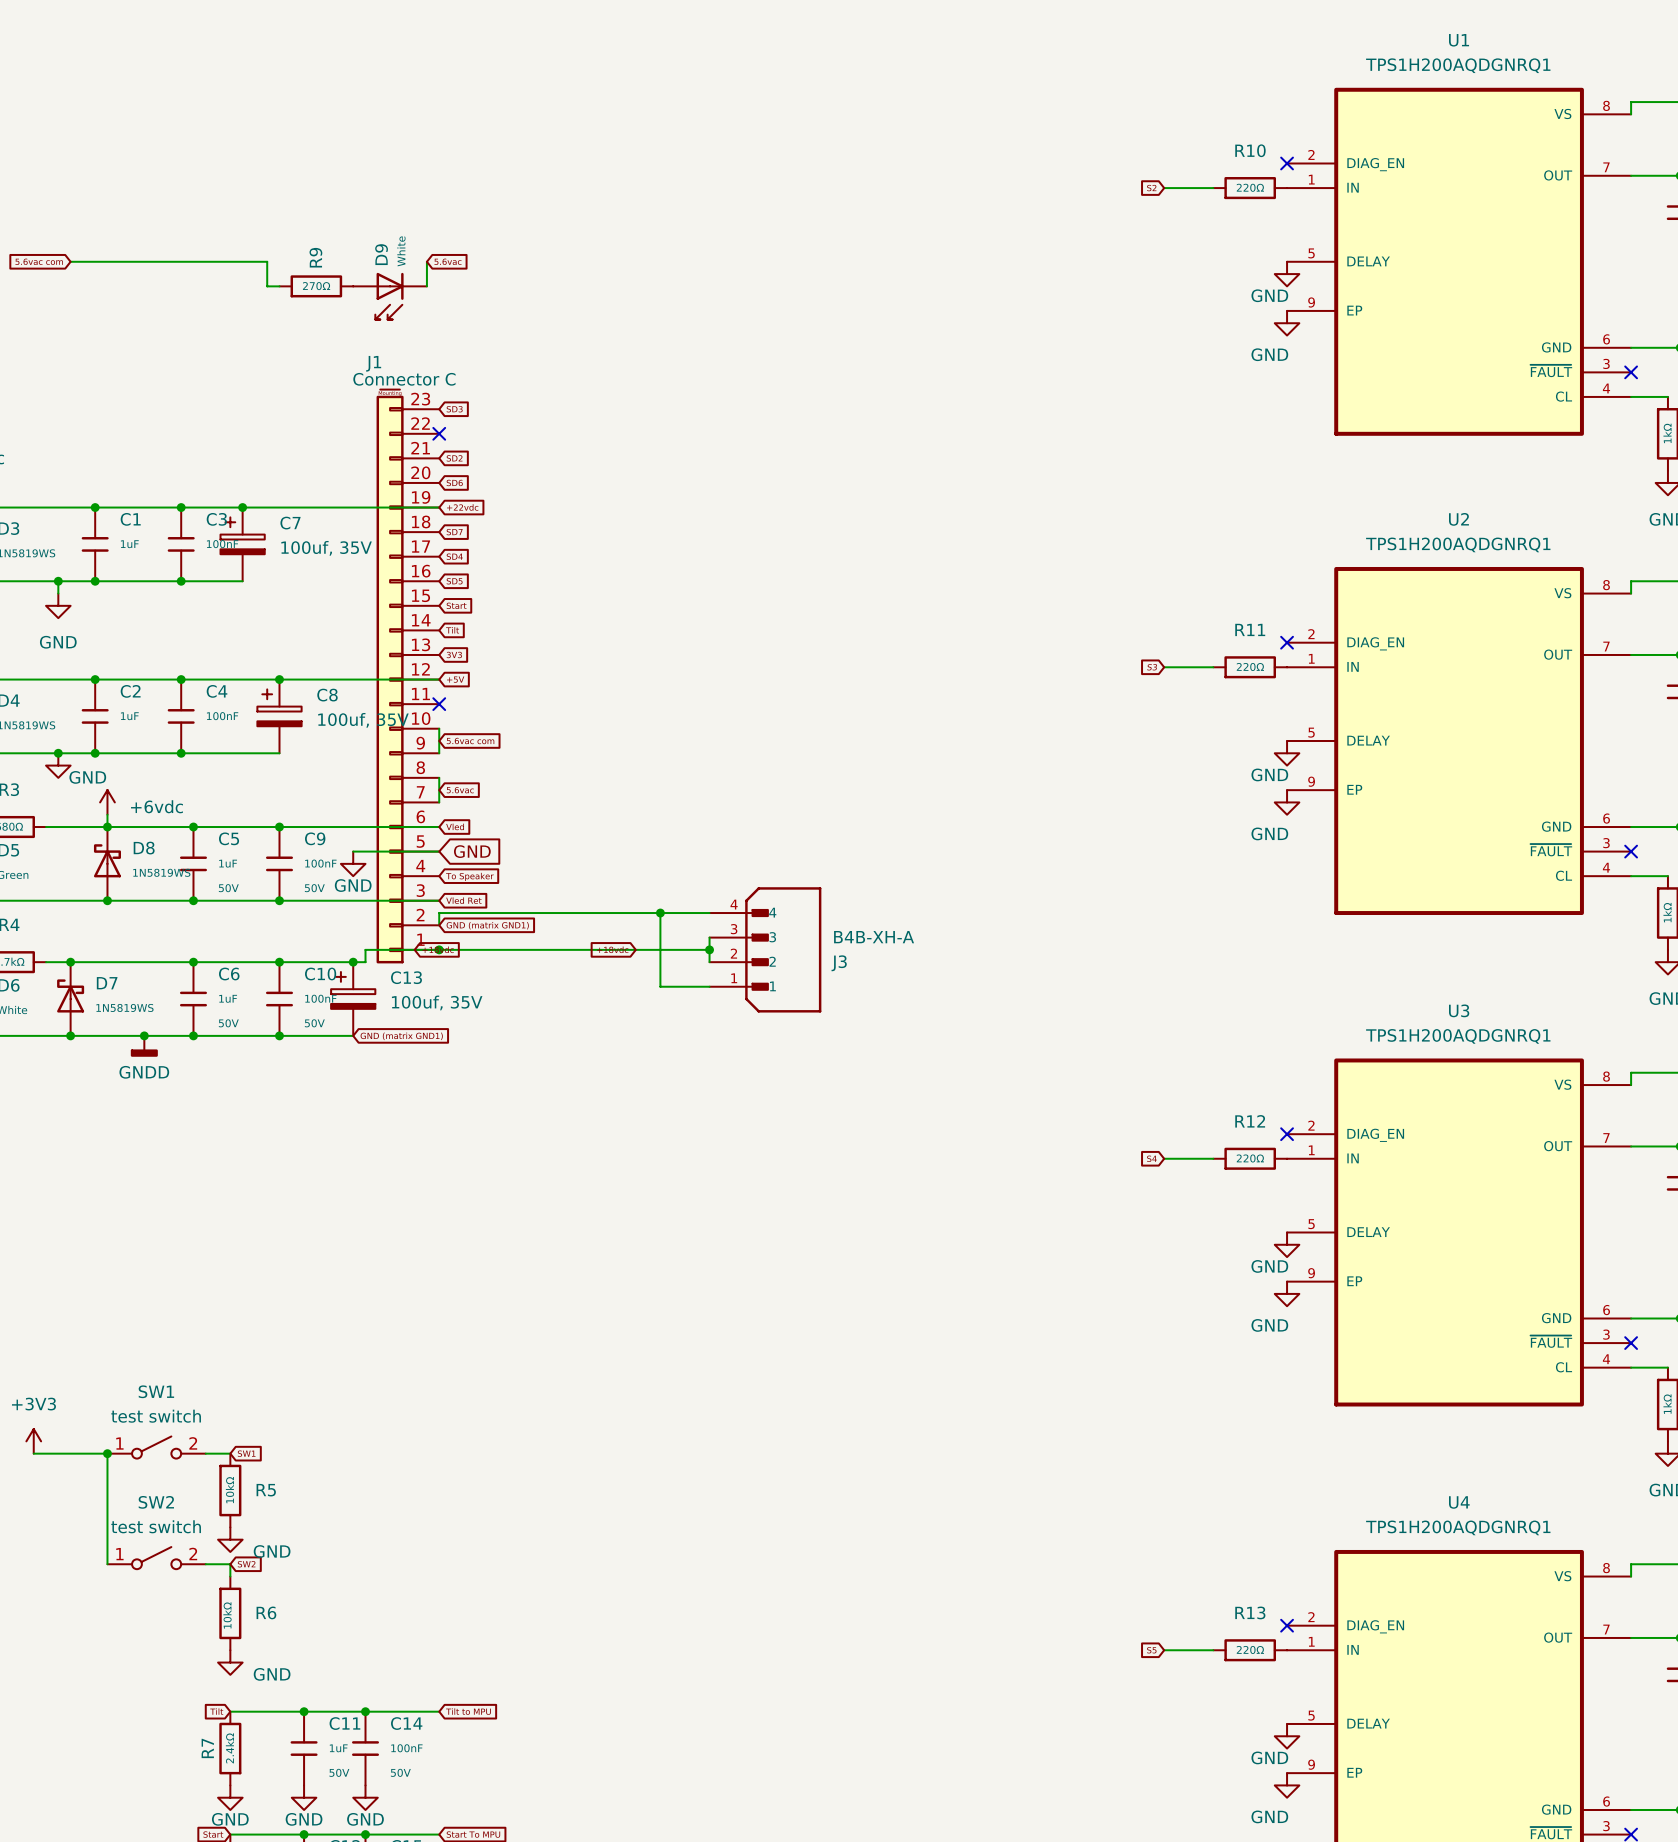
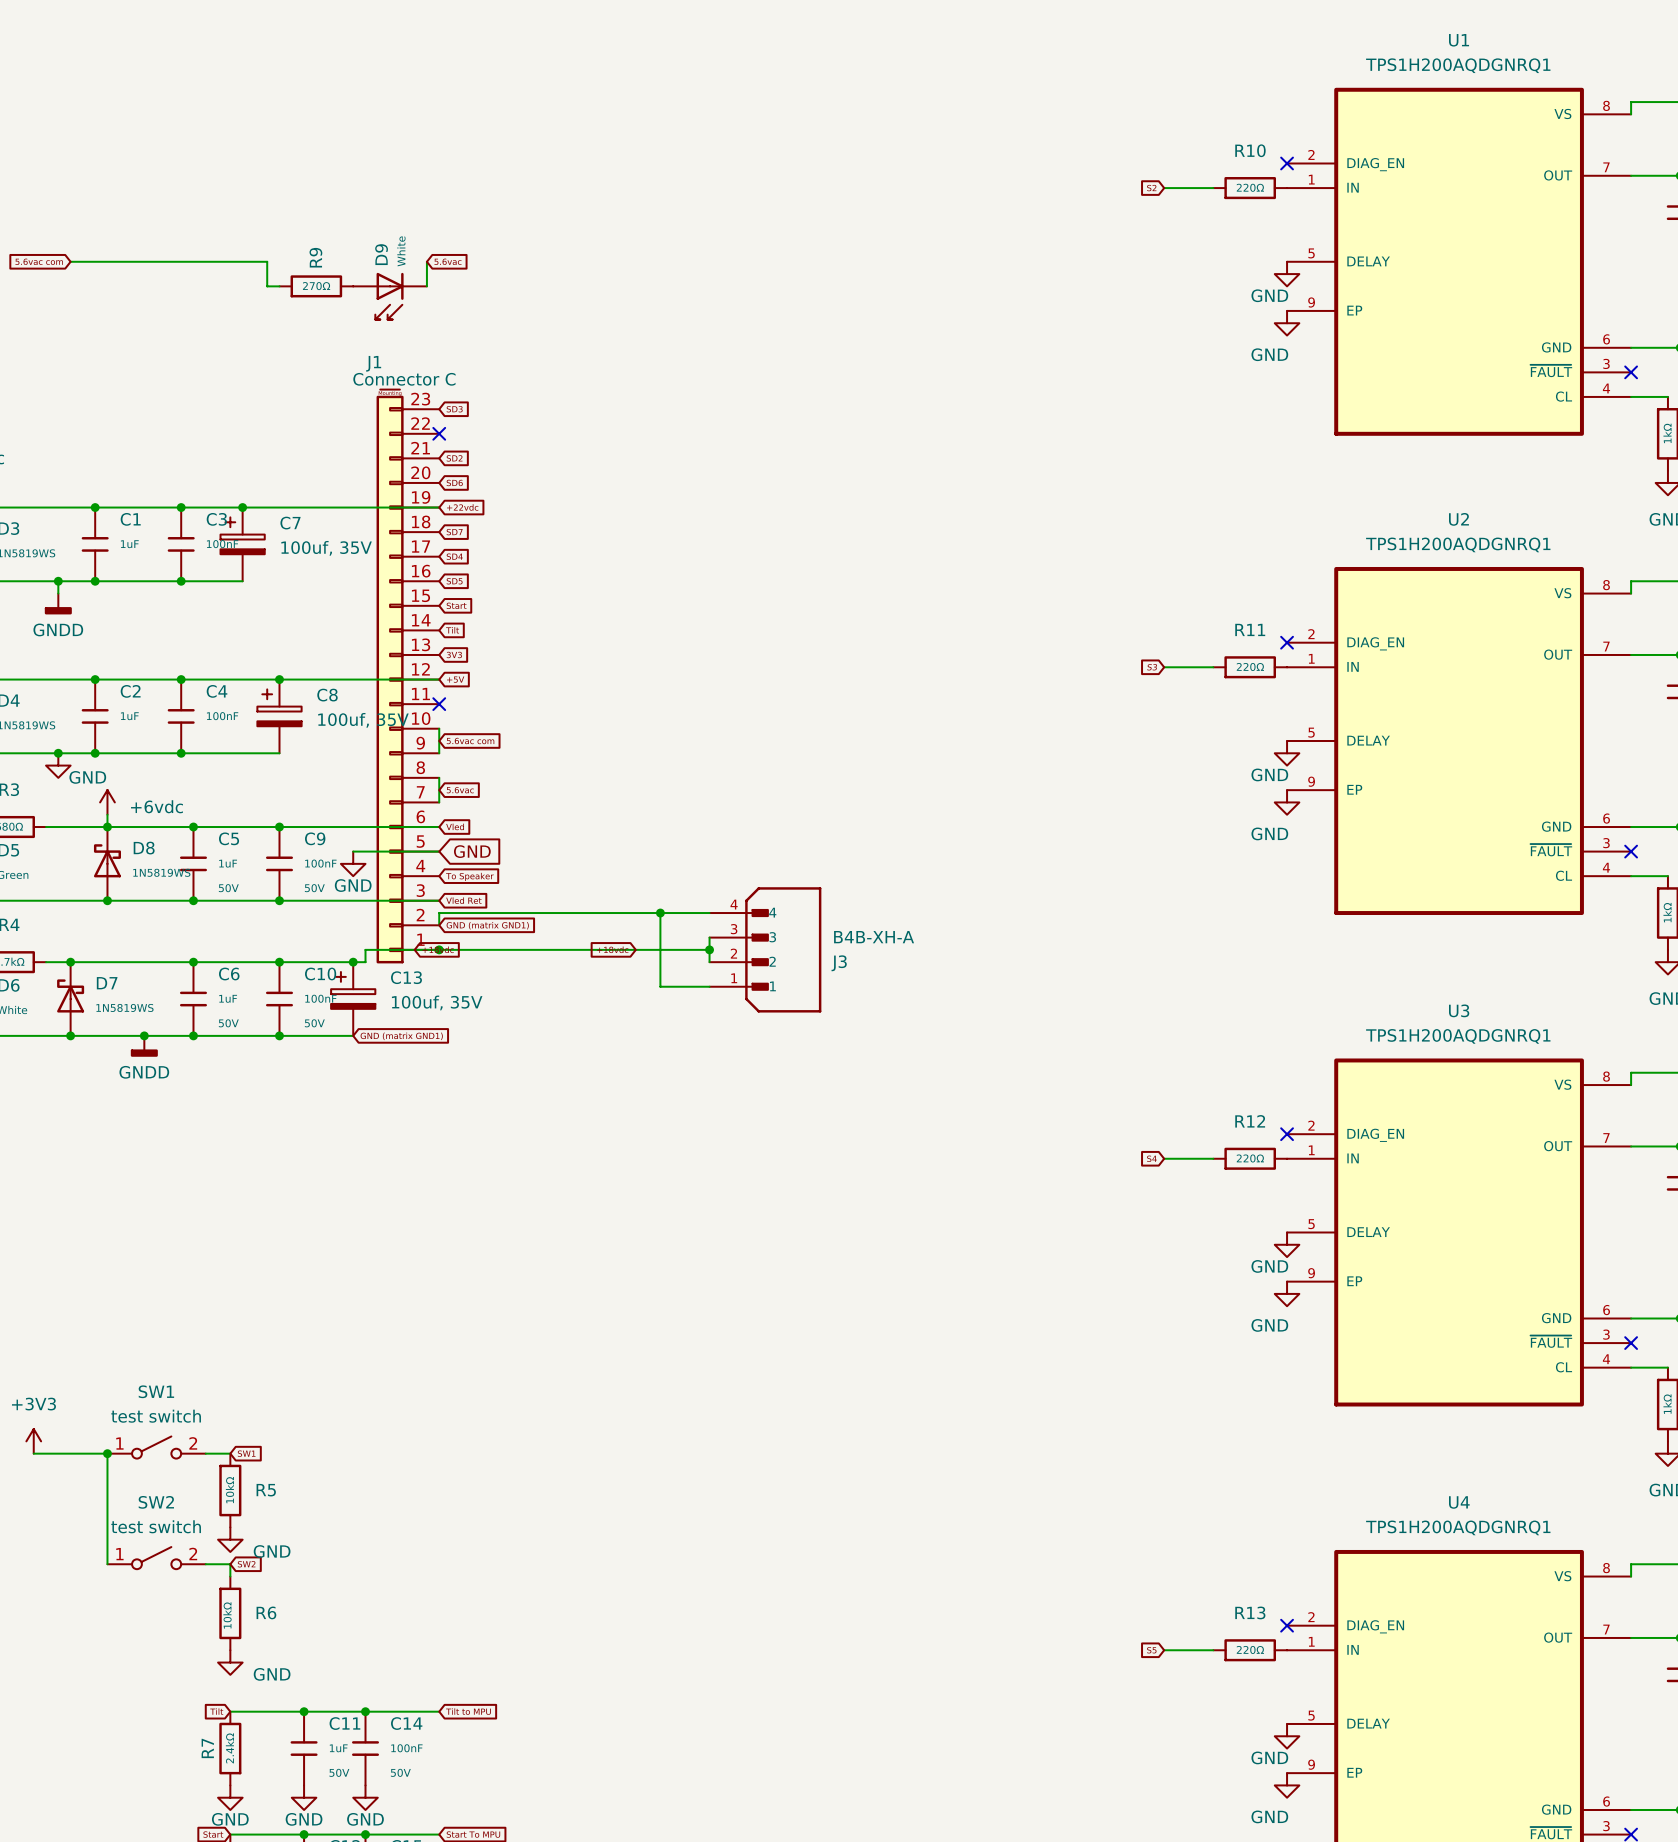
power symbol: GND (58, 605) -> GNDD (58, 603)

